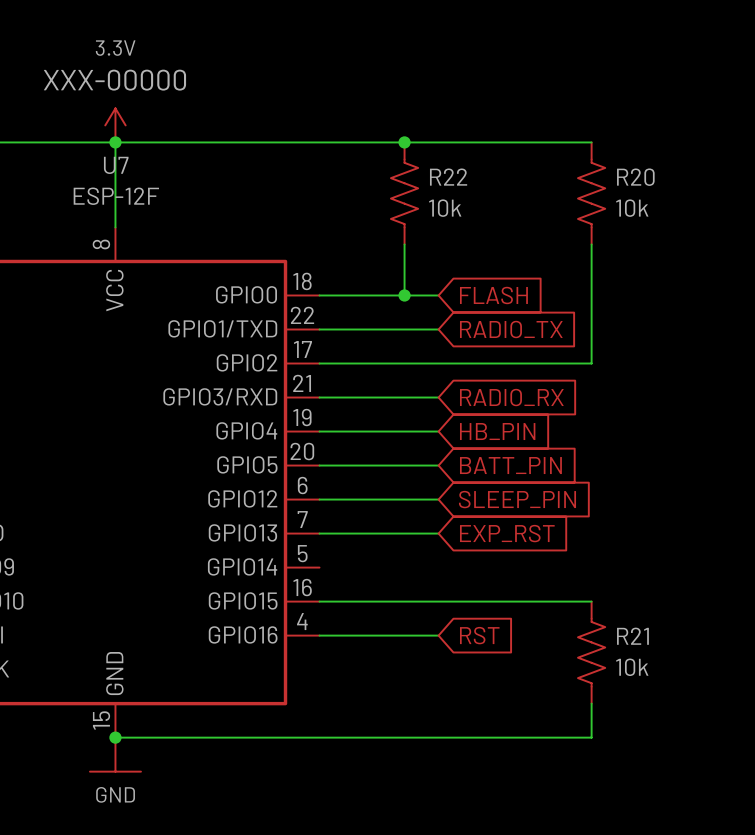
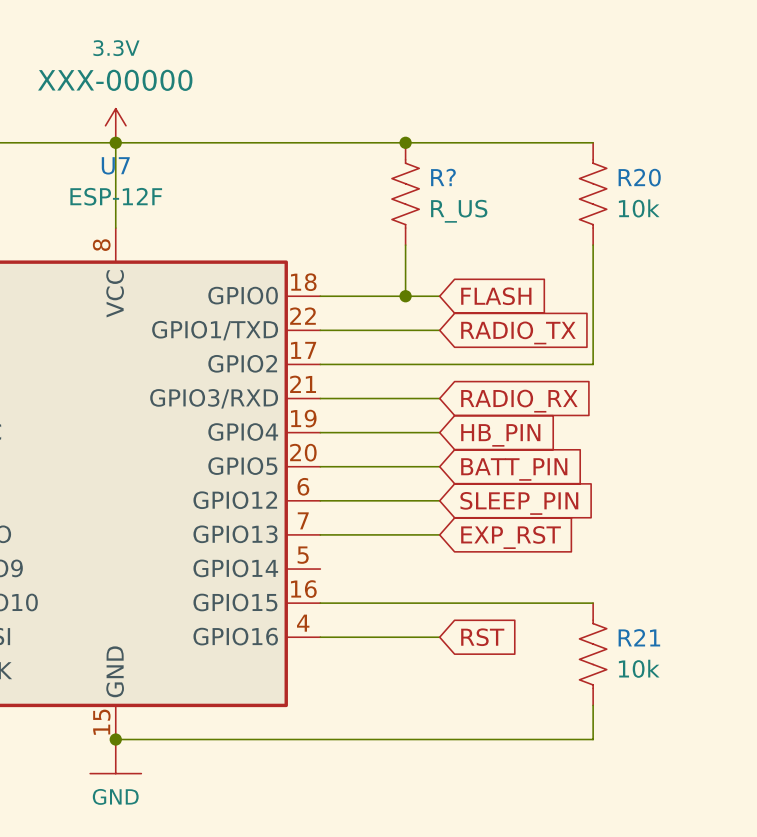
R22 name: R22 (448, 177) -> R? (443, 177)
R22 value: 10k (445, 208) -> R_US (459, 211)

